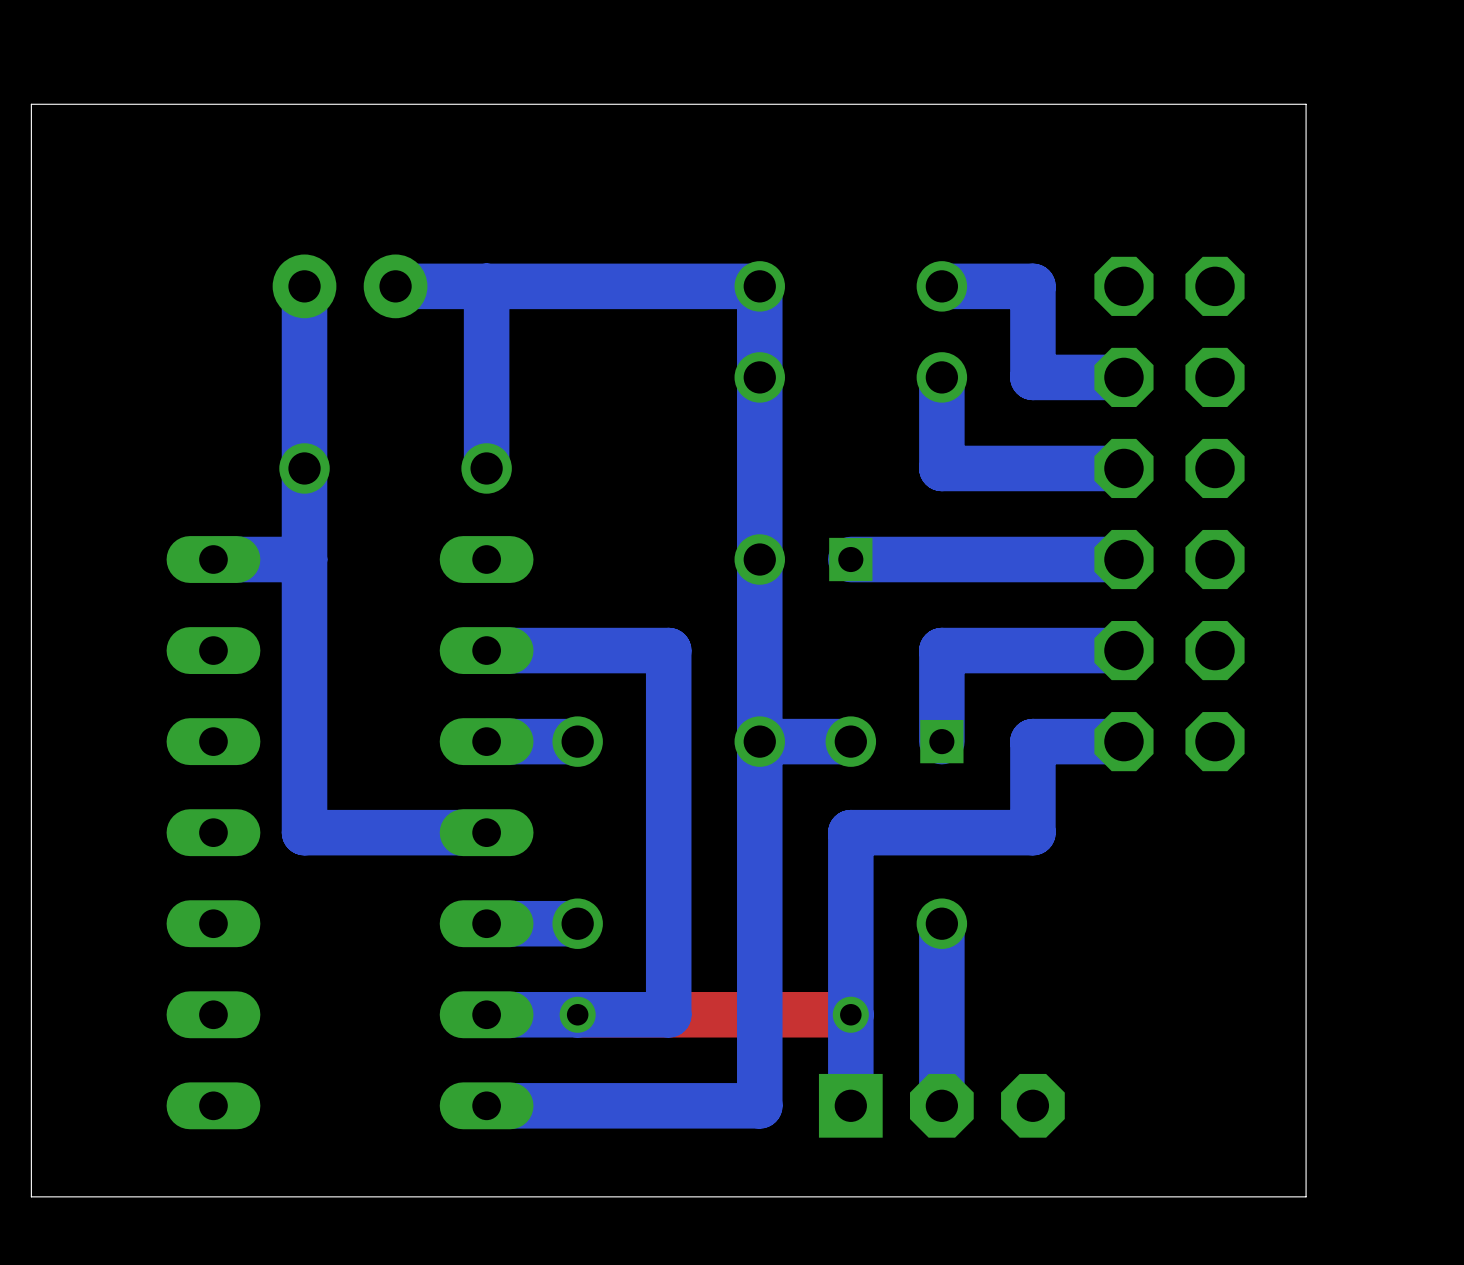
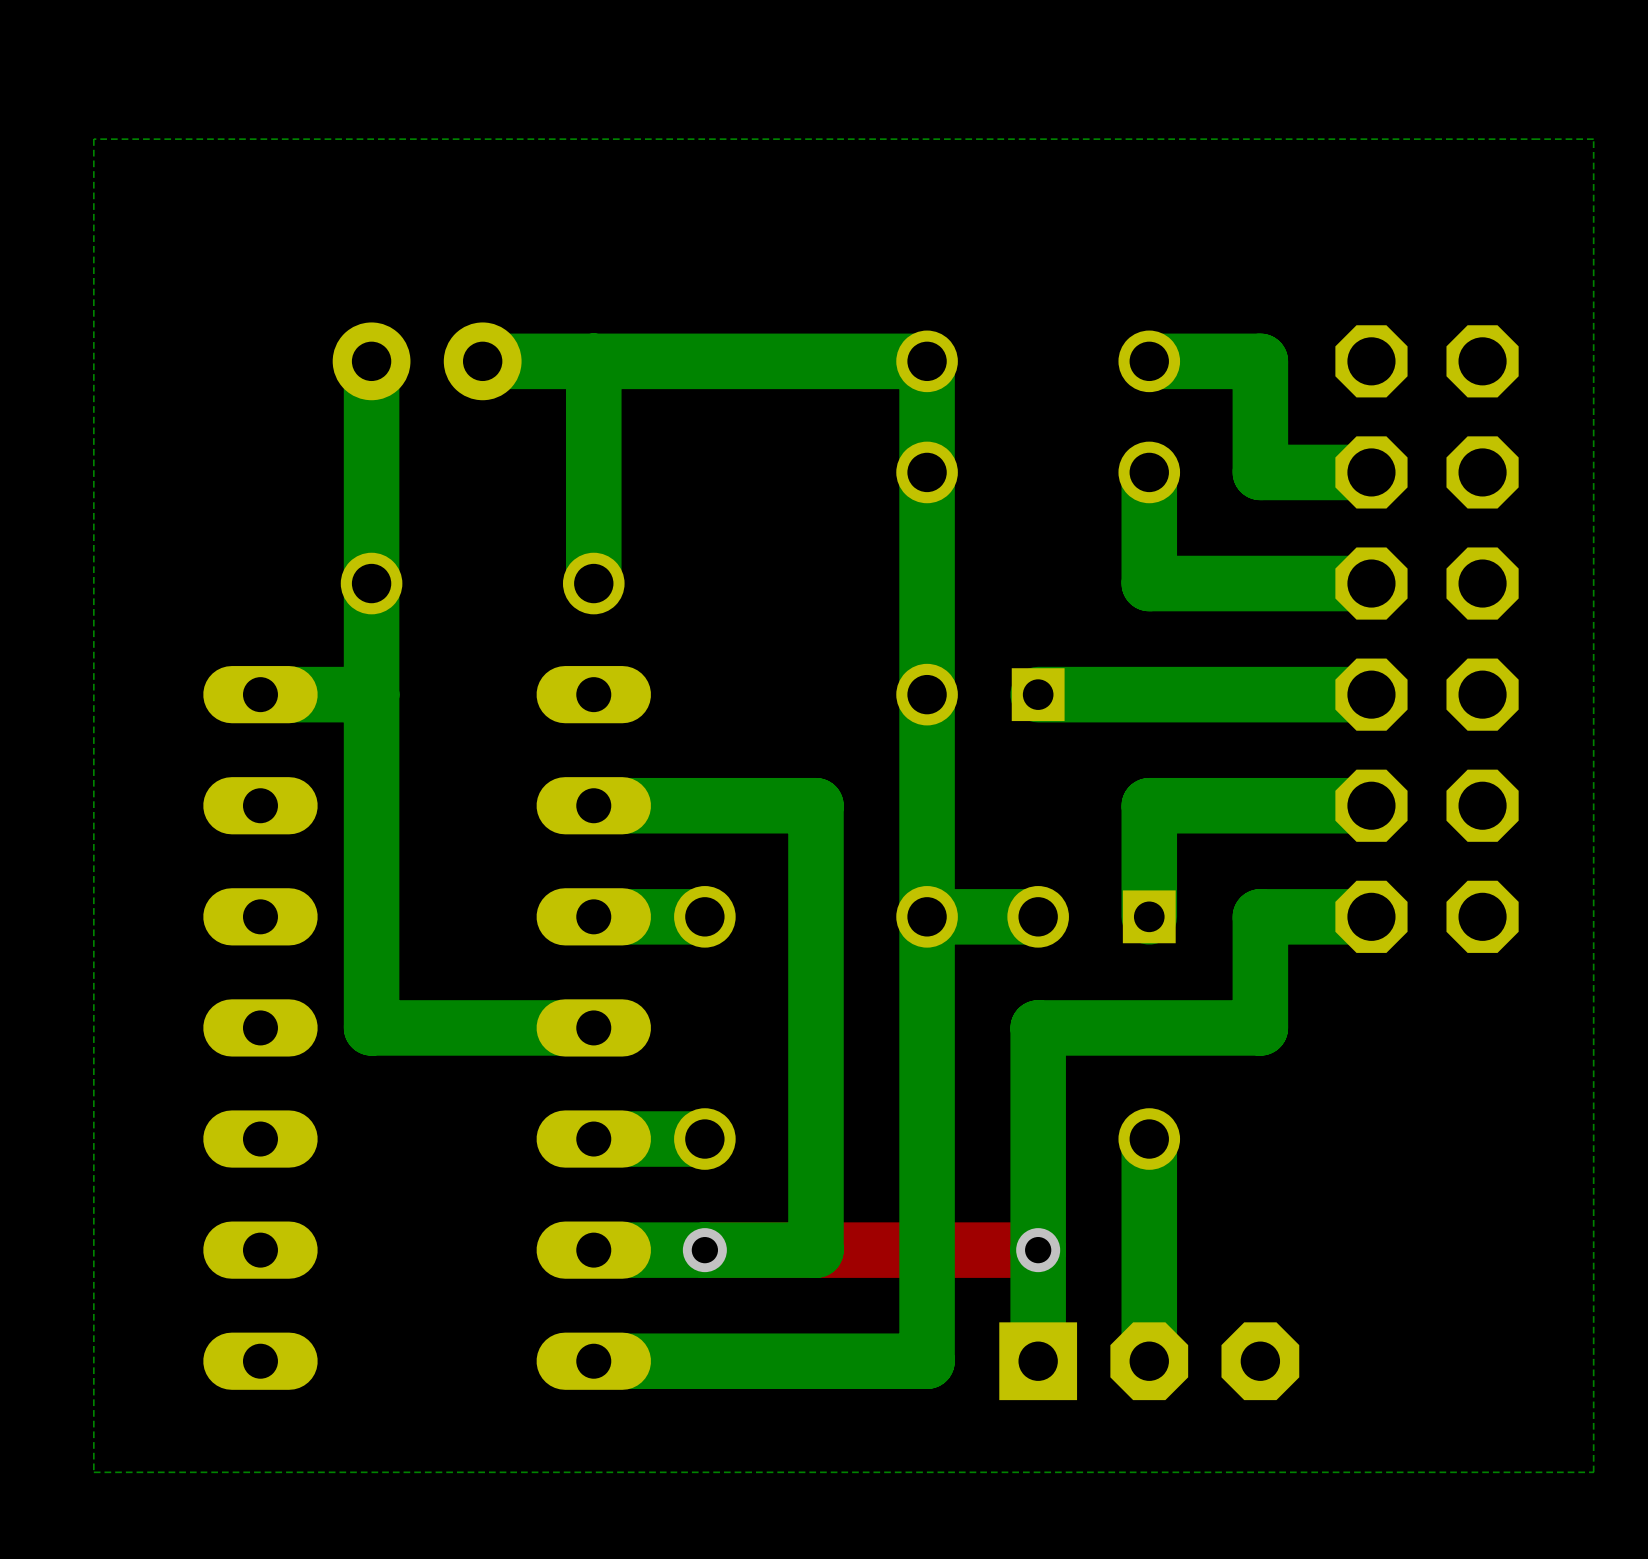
board edge: (1306, 104) (31, 104) (31, 1196) (1306, 1196) (1306, 104) -> none
bottom zone outline: none -> (1593, 139) (1593, 1472) (93, 1472) (93, 139) (1593, 139)

